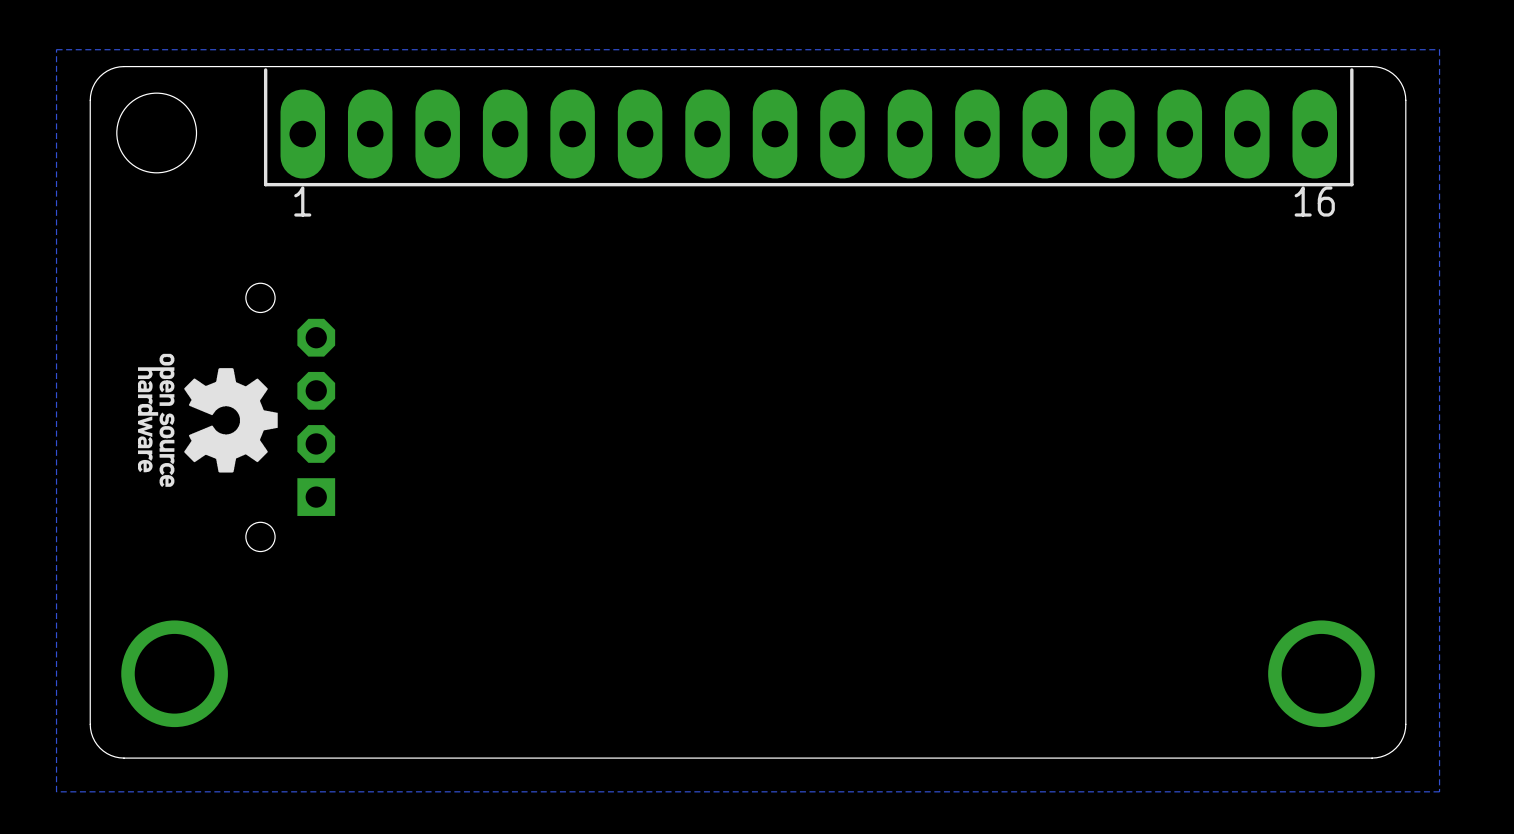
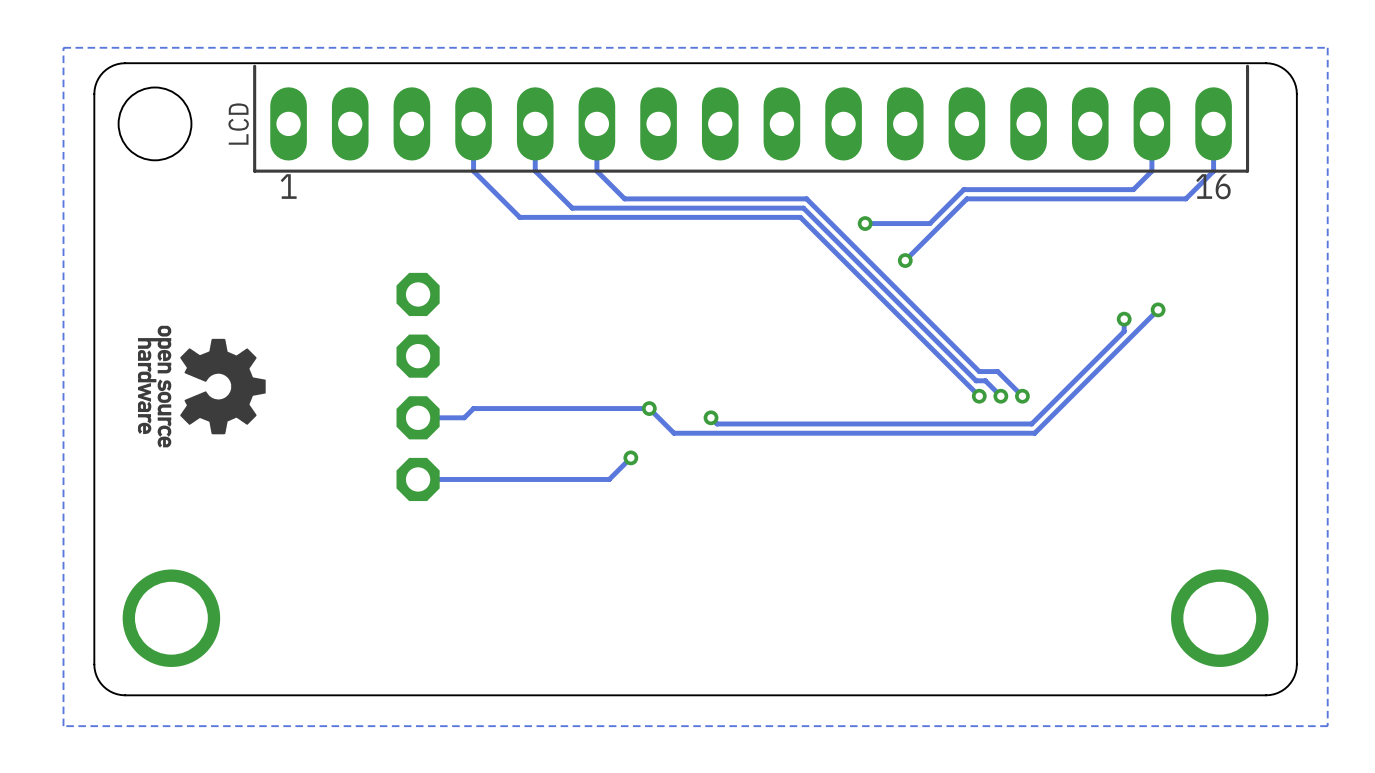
track: none -> (473, 123) (473, 171) (519, 217) (800, 217) (979, 396)
track: none -> (596, 123) (596, 171) (624, 198) (806, 198) (979, 371) (997, 371) (1022, 396)
LCD: none -> (751, 123)
track: none -> (1151, 123) (1151, 171) (1133, 189) (963, 189) (929, 223) (865, 223)
track: none -> (1213, 123) (1213, 171) (1185, 198) (966, 198) (905, 260)
track: none -> (535, 123) (535, 171) (572, 208) (803, 208) (976, 380) (985, 380) (1000, 396)
part: (808, 134) -> none
via: none -> (865, 223)
via: none -> (905, 260)
track: none -> (1158, 309) (1034, 433) (674, 433) (649, 408) (473, 408) (464, 417) (418, 417)
via: none -> (1158, 309)
track: none -> (1124, 319) (1124, 331) (1031, 423) (717, 423) (711, 417)
via: none -> (1124, 319)
part: (290, 417) -> none
part: none -> (418, 386)
via: none -> (979, 396)
via: none -> (1000, 396)
via: none -> (1022, 396)
via: none -> (649, 408)
via: none -> (711, 417)
track: none -> (630, 457) (609, 479) (418, 479)
via: none -> (630, 457)

